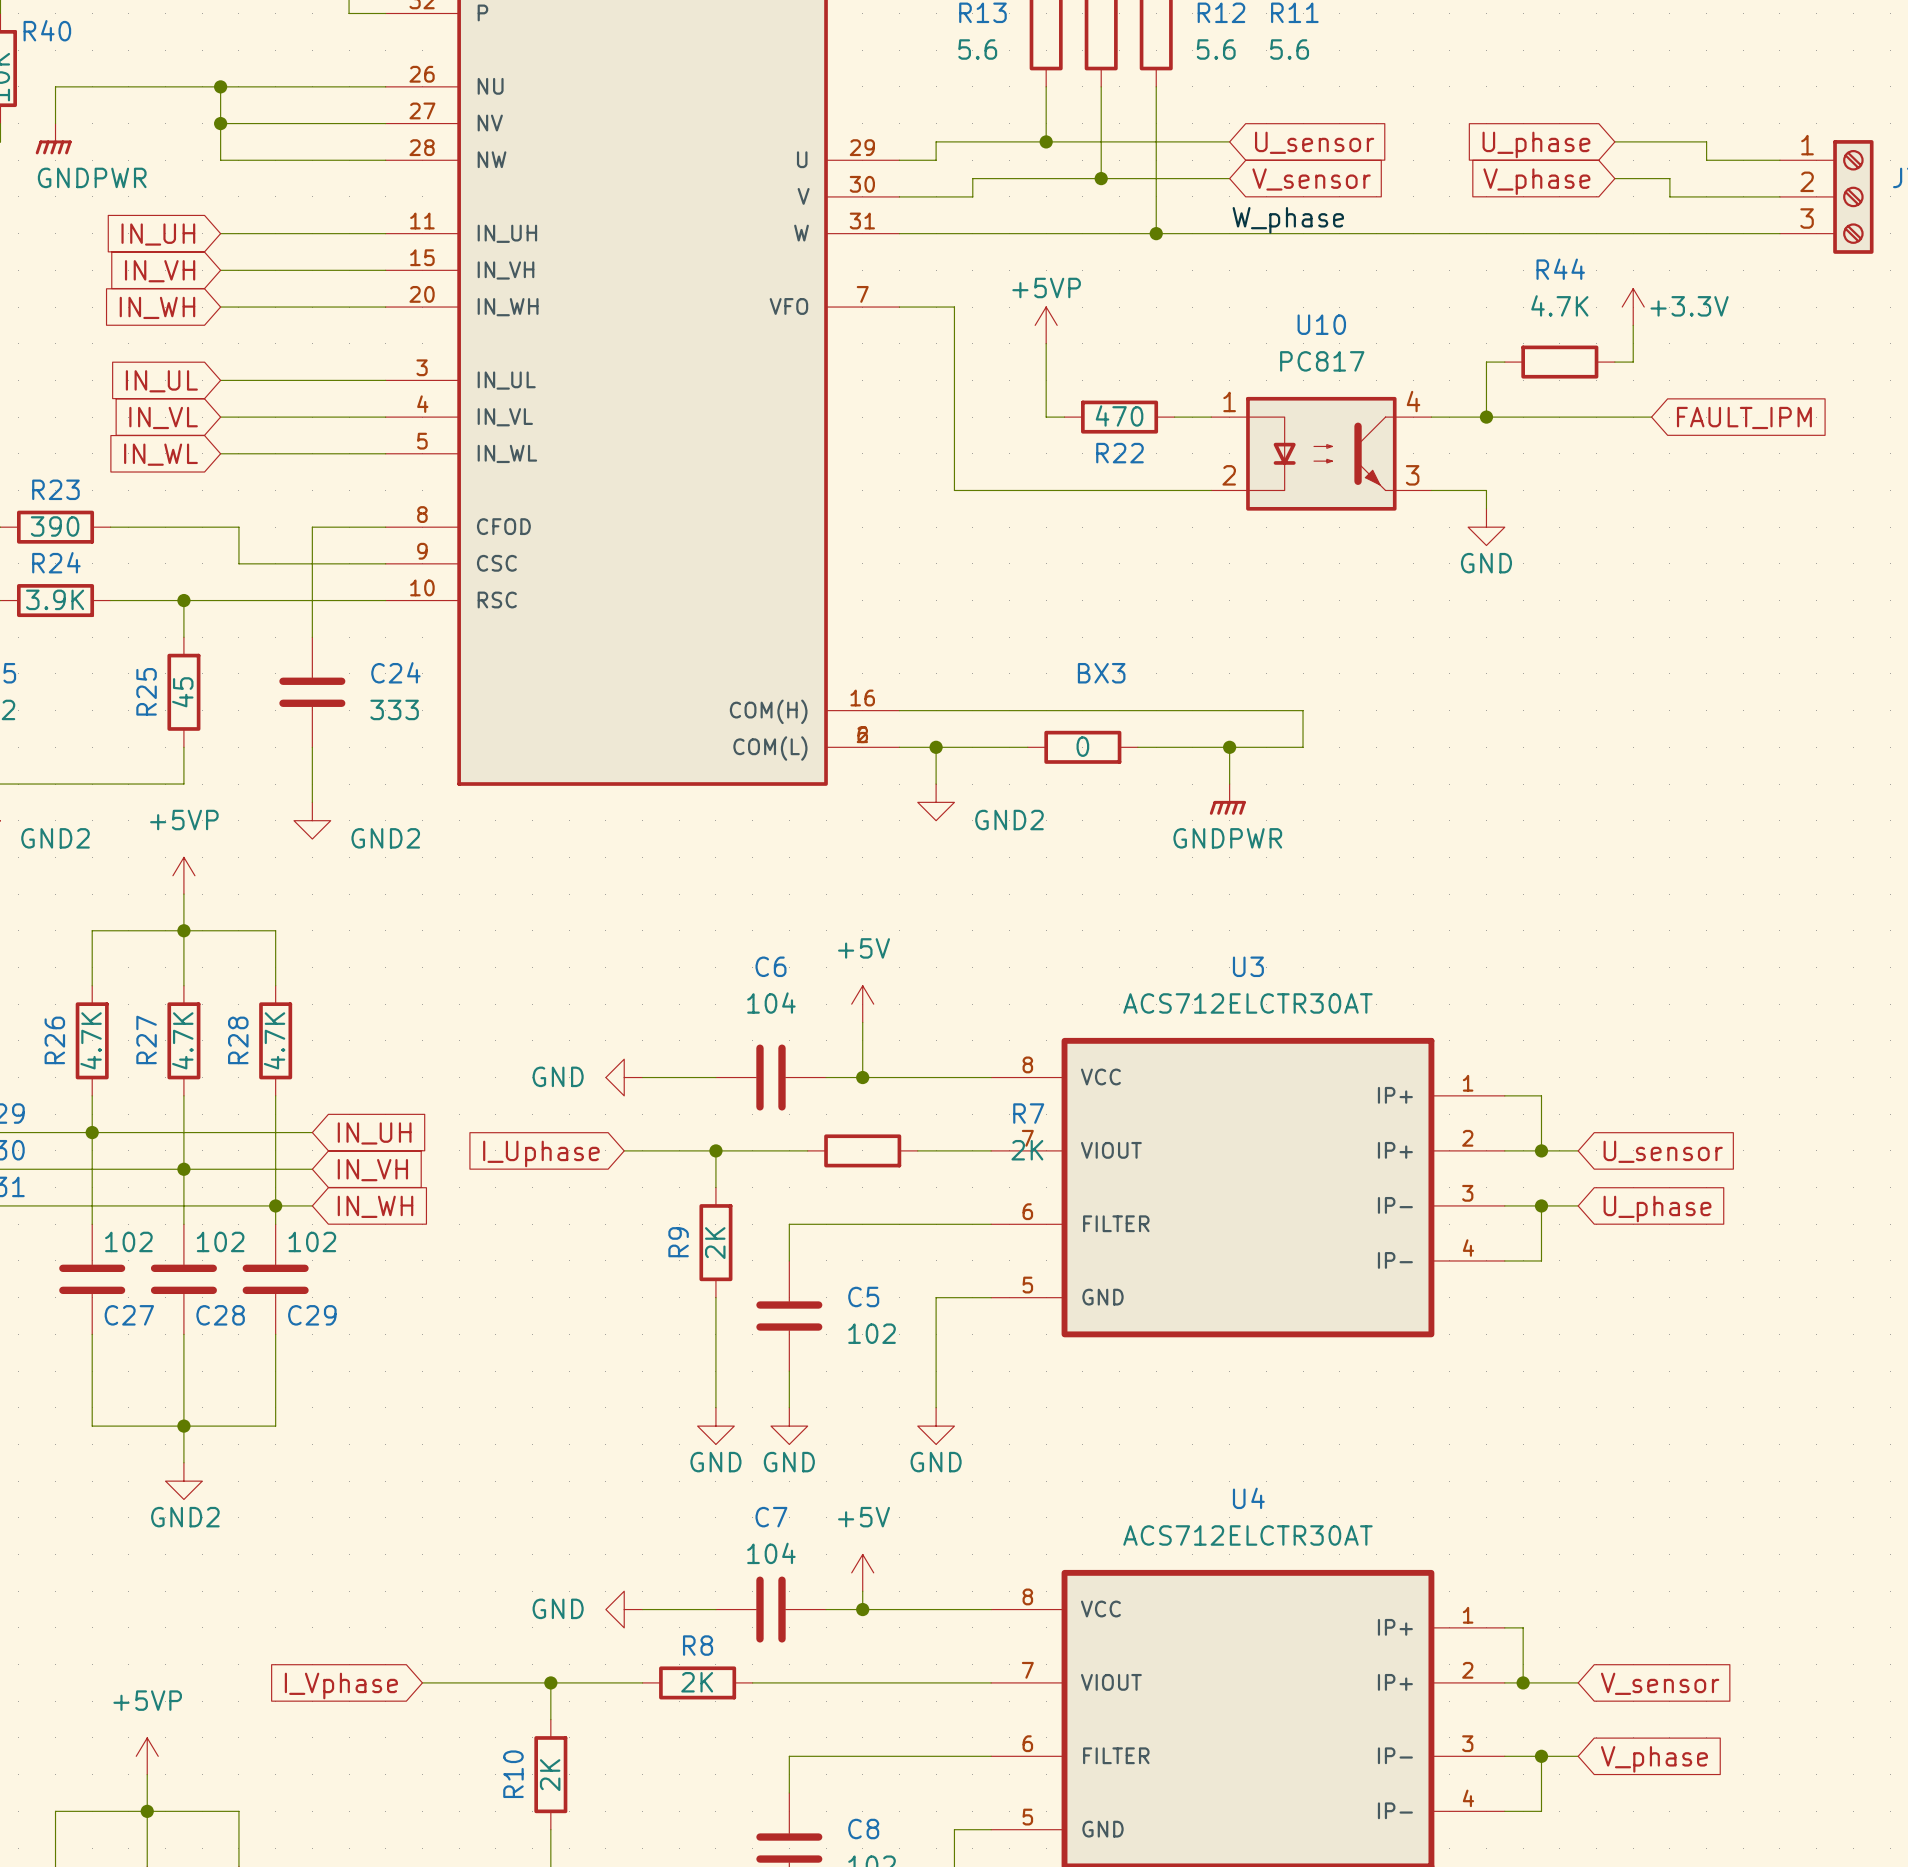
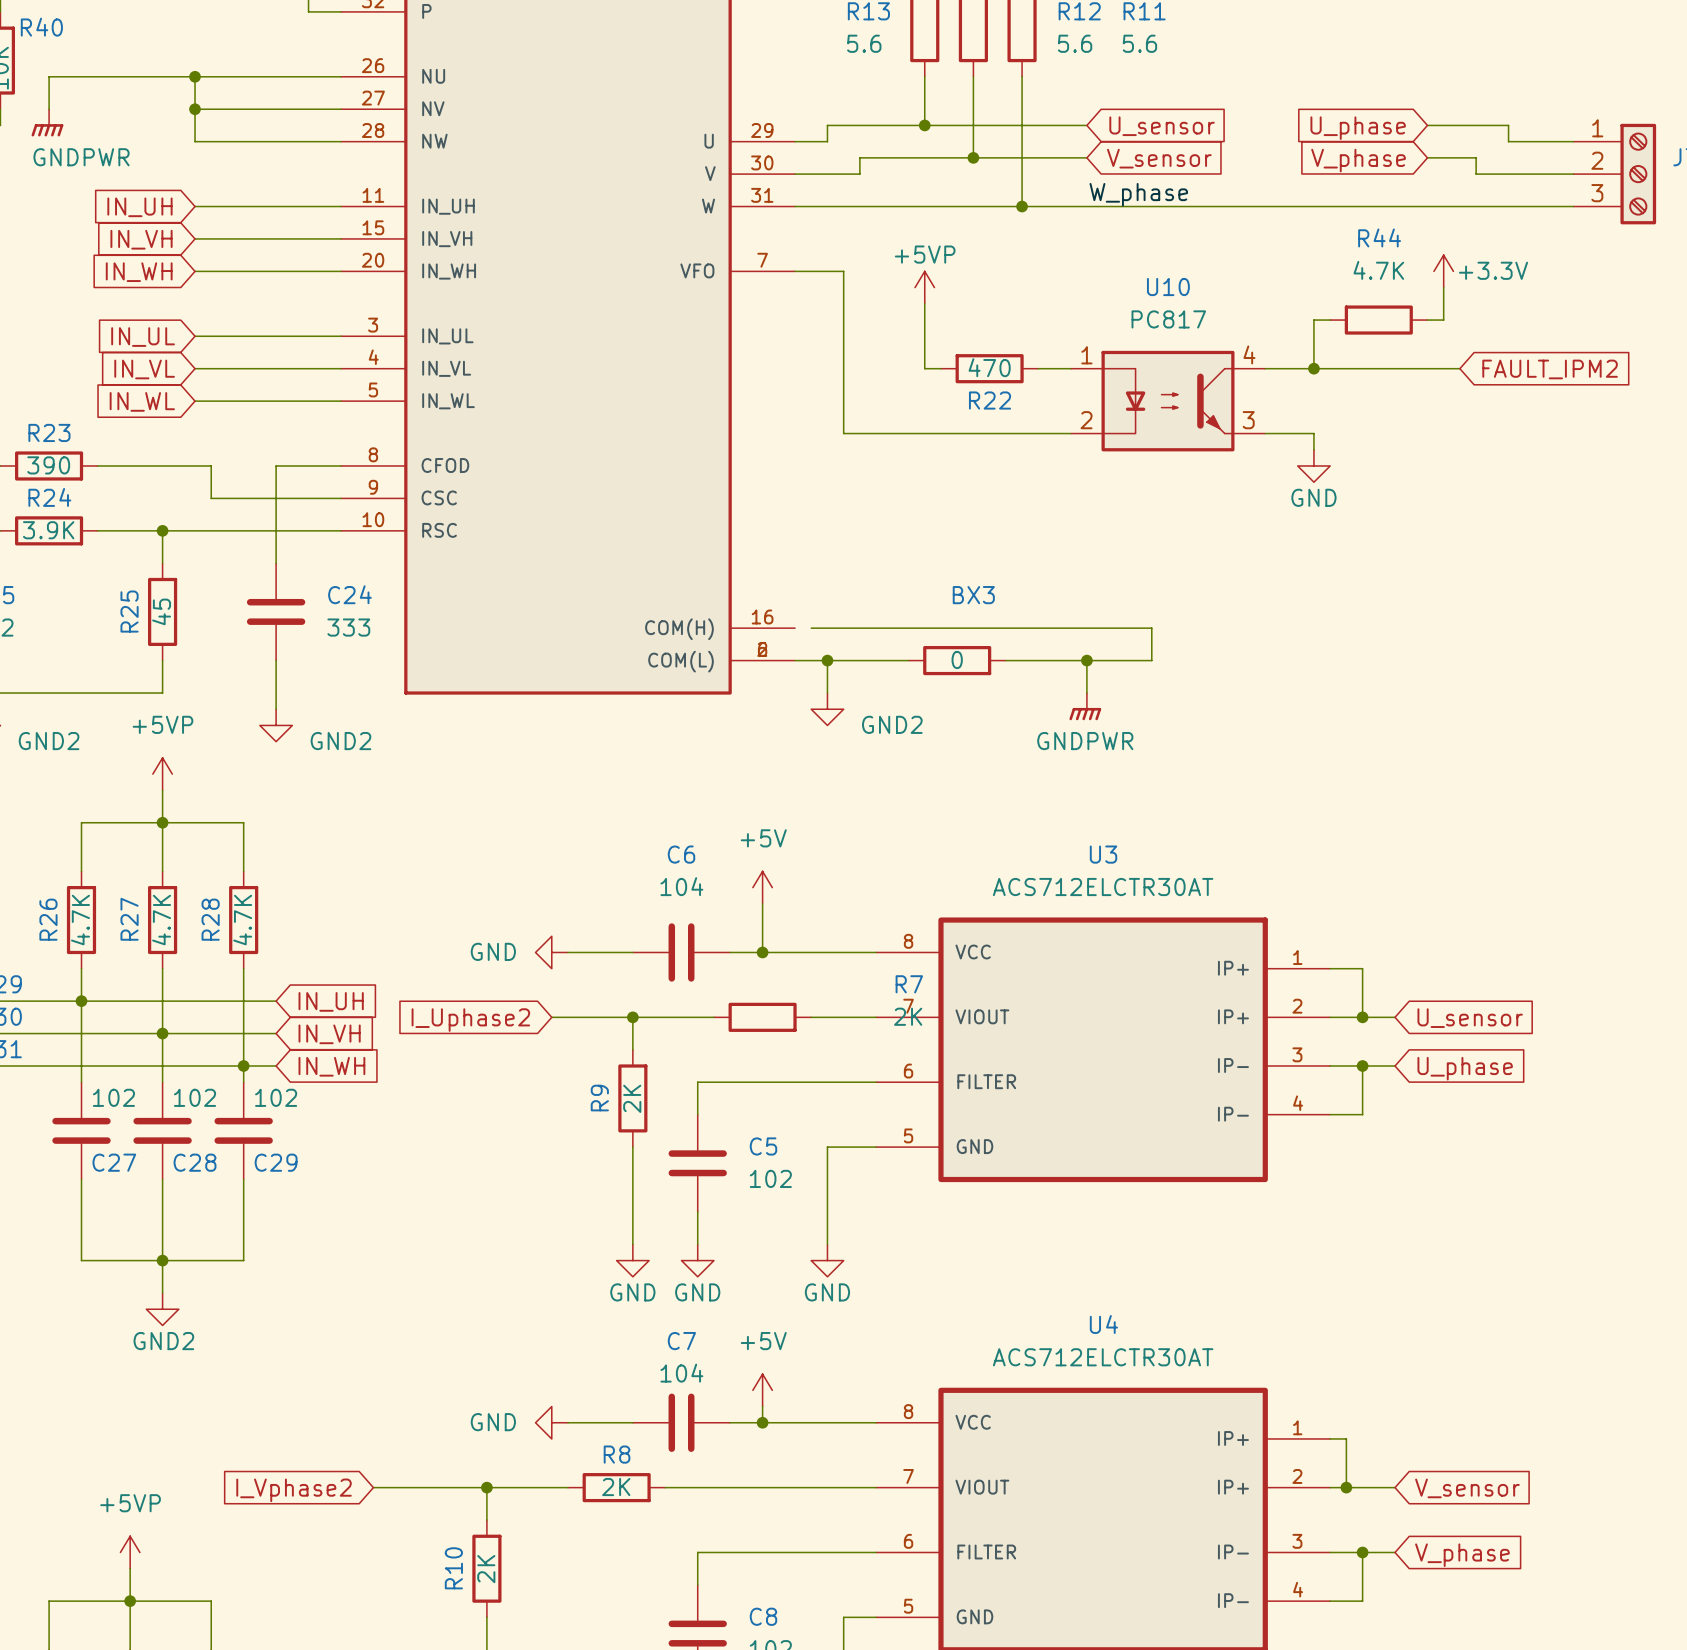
global label: FAULT_IPM (1744, 417) -> FAULT_IPM2 (1550, 369)
wire: (899, 710) (917, 710) -> none
global label: I_Uphase (541, 1153) -> I_Uphase2 (470, 1020)
global label: I_Vphase (341, 1685) -> I_Vphase2 (294, 1490)

